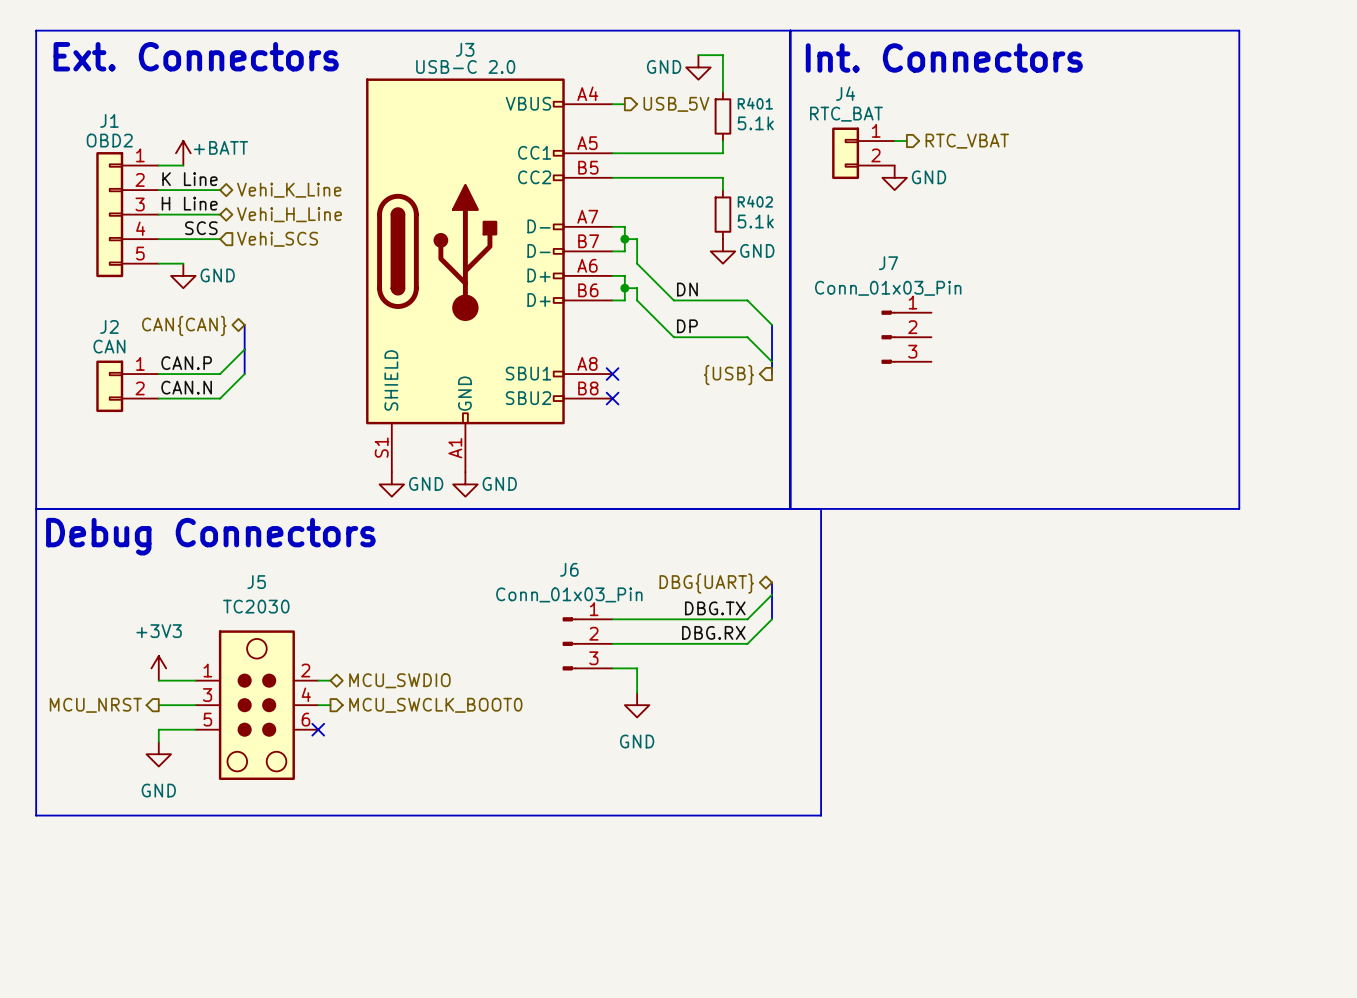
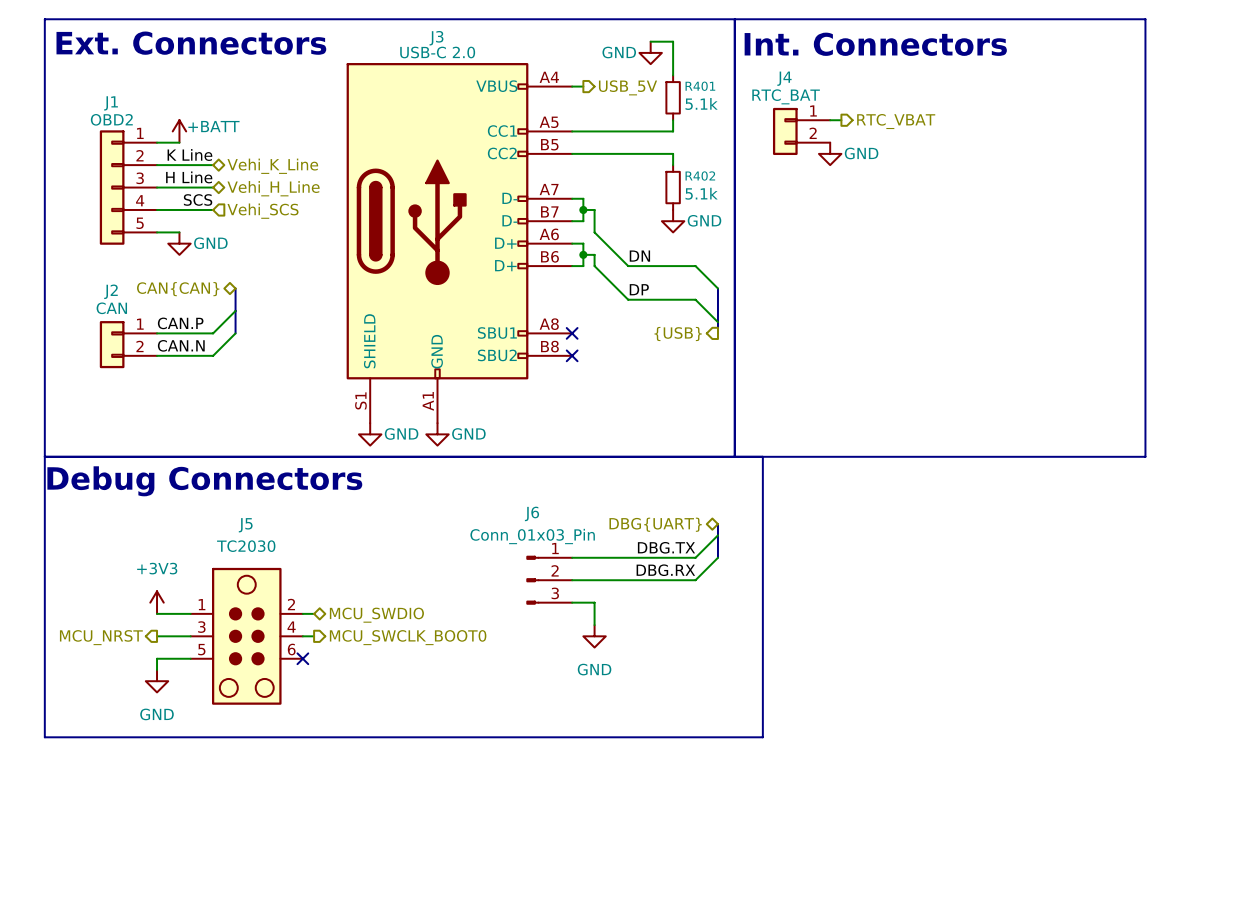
J7: Conn_01x03_Pin (906, 337) -> none

